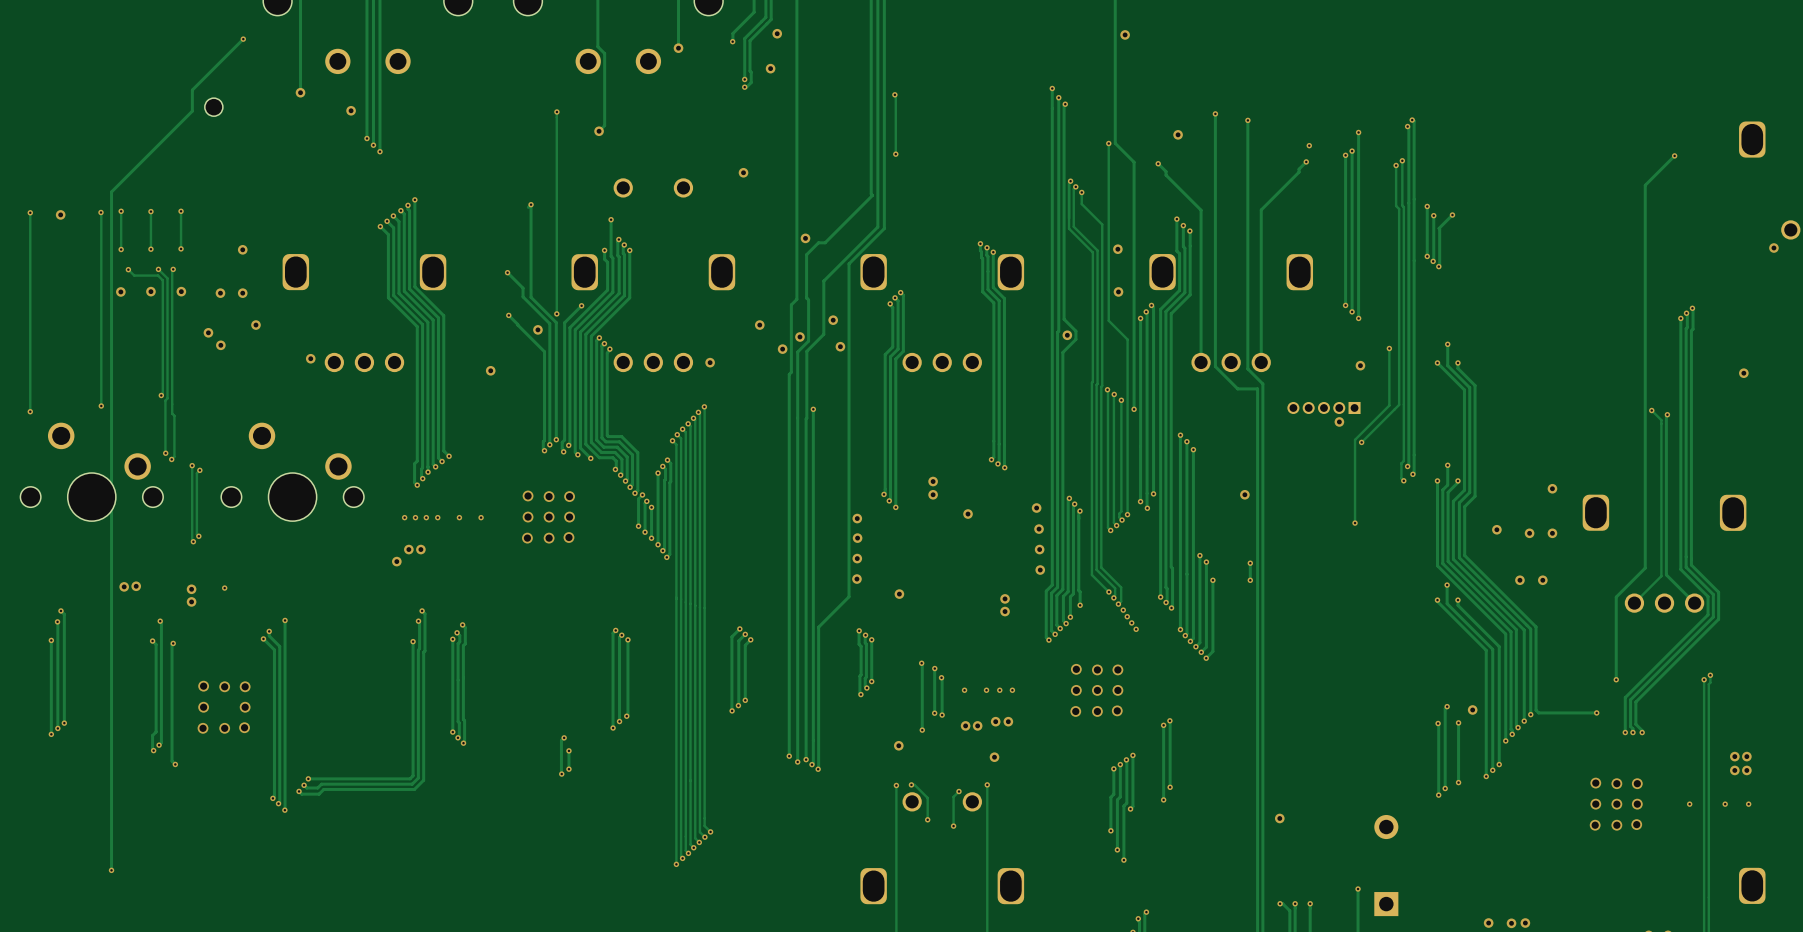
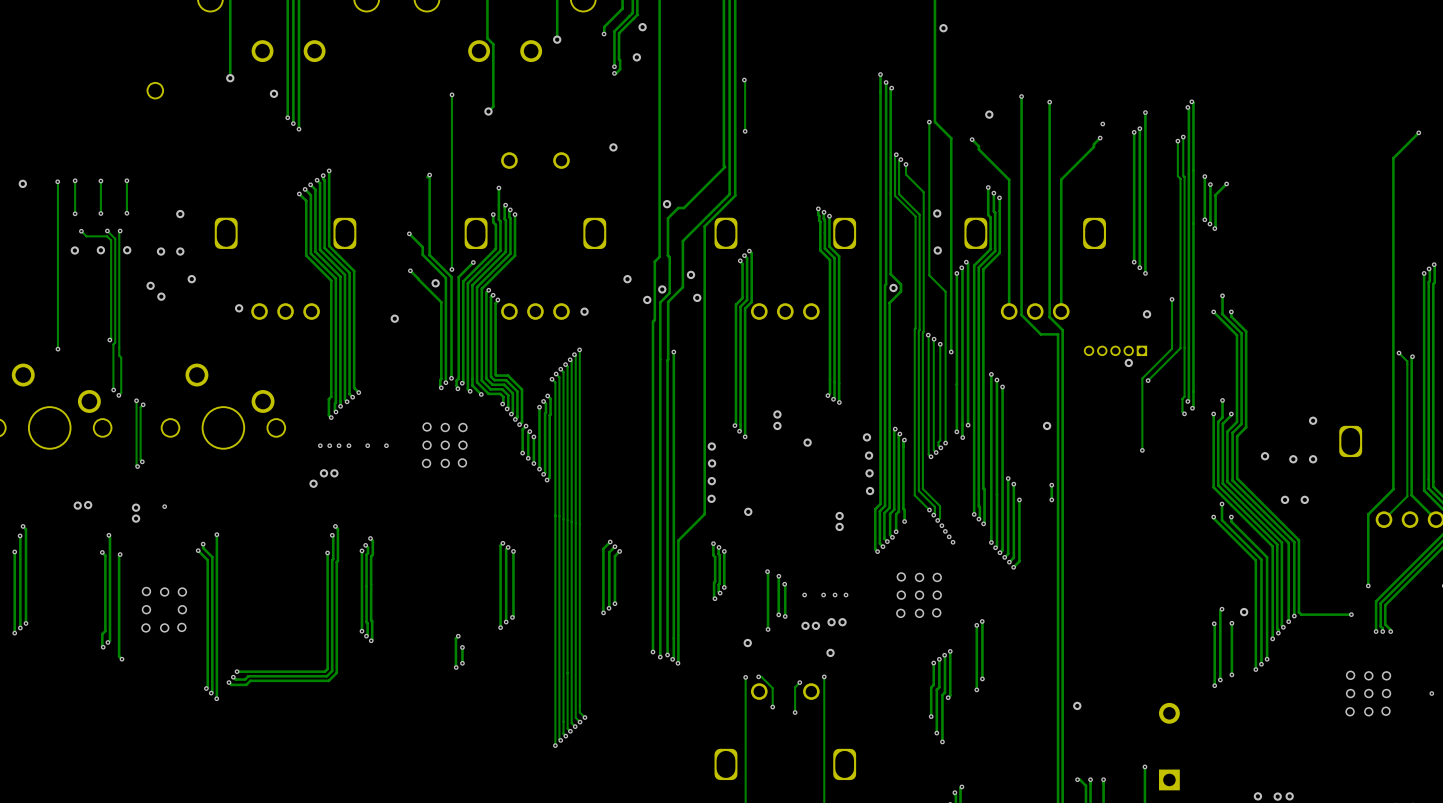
track: (243, 39) (192, 90) (192, 111) (111, 191) (111, 870) -> none
via: (243, 39) -> none
via: (111, 870) -> none

